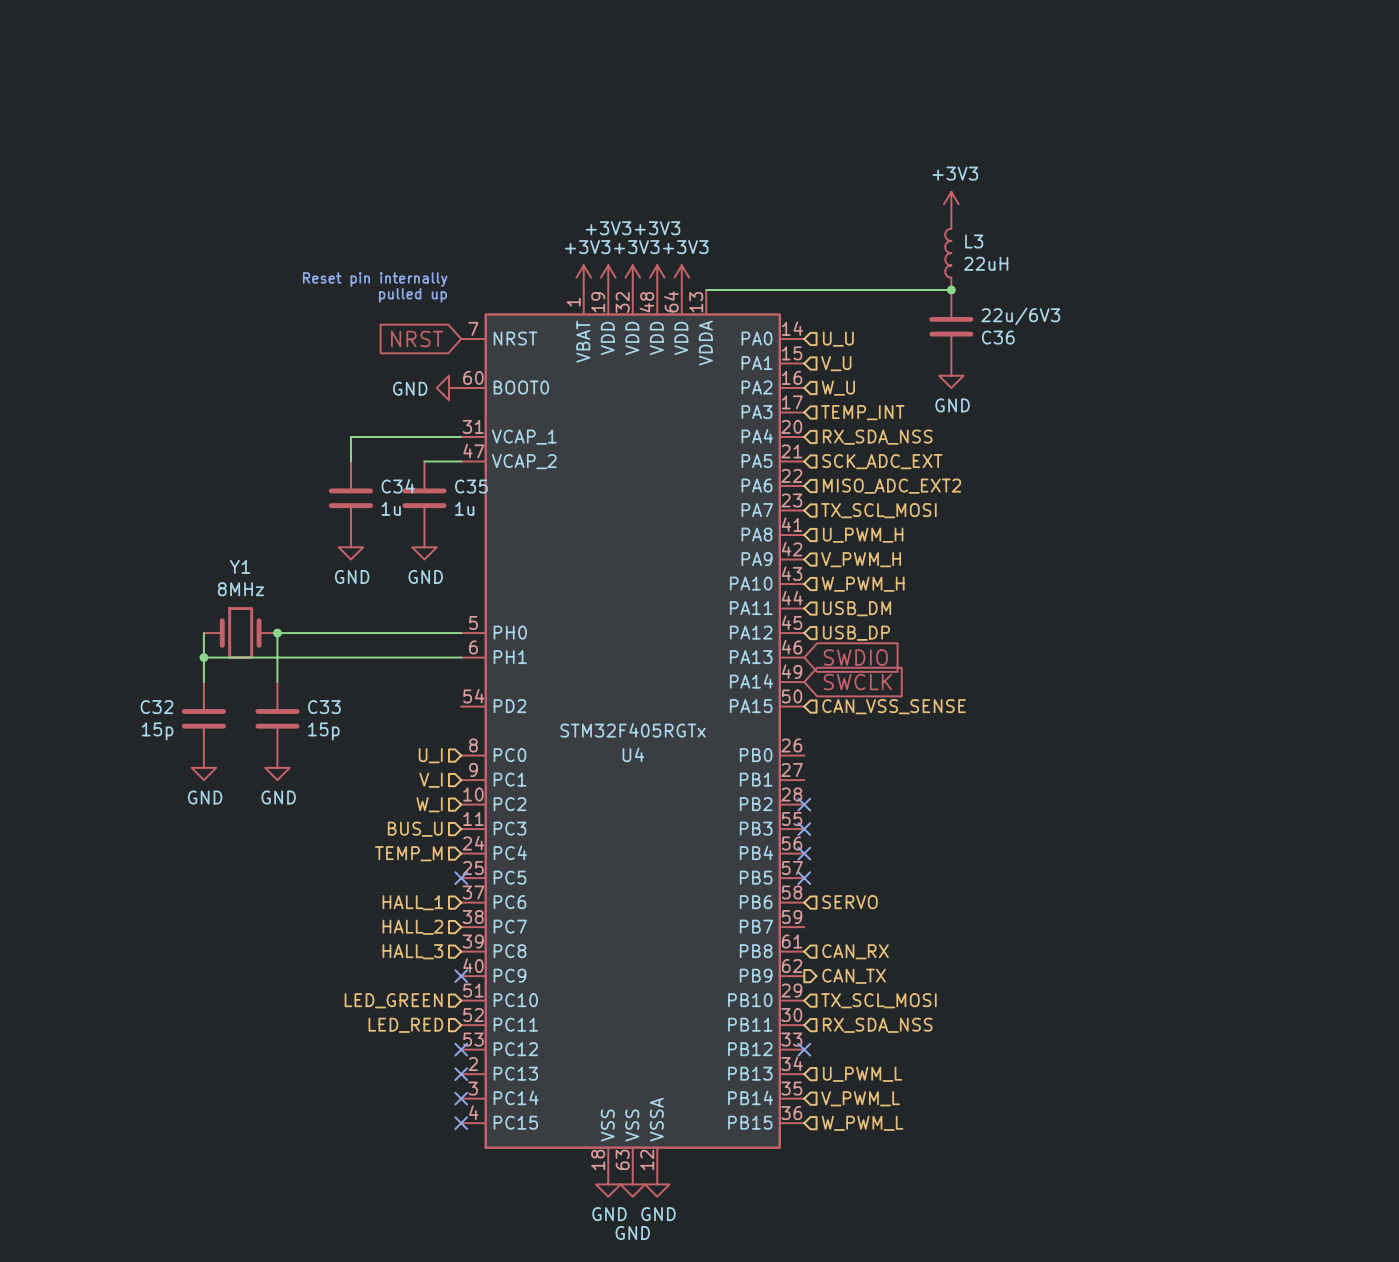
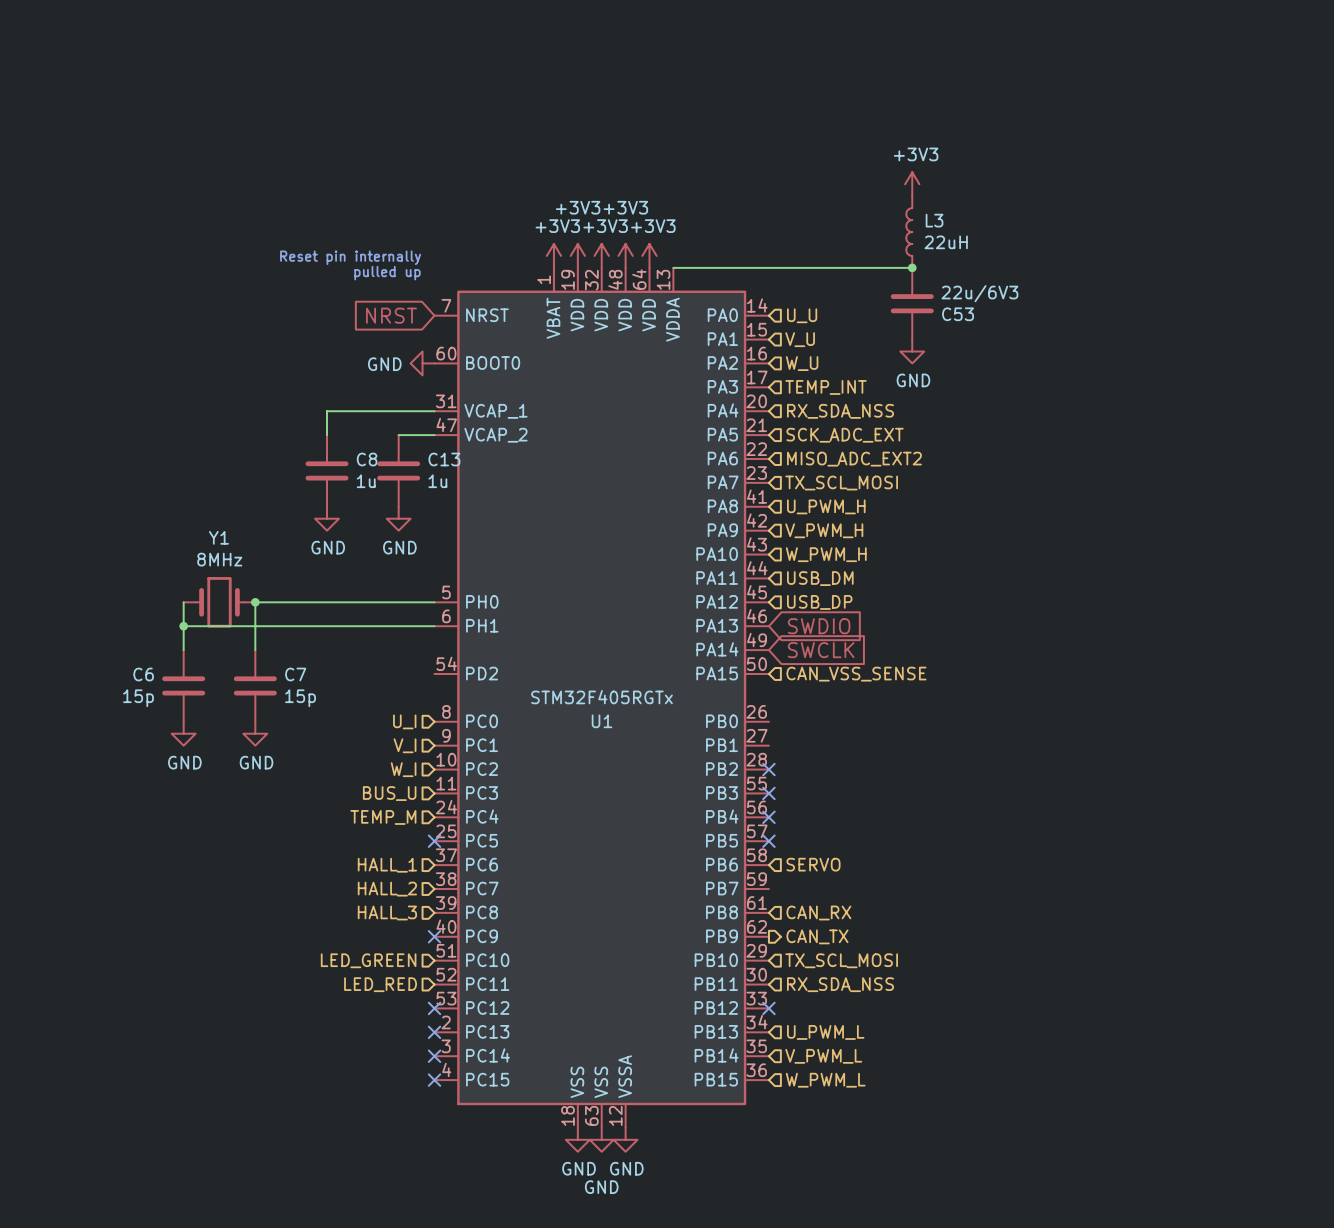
C36 name: C36 (998, 337) -> C53 (958, 314)
C34 name: C34 (398, 486) -> C8 (367, 459)
C35 name: C35 (471, 486) -> C13 (444, 459)
C32 name: C32 (156, 707) -> C6 (143, 674)
C33 name: C33 (324, 707) -> C7 (295, 674)
U4 name: U4 (633, 754) -> U1 (602, 721)

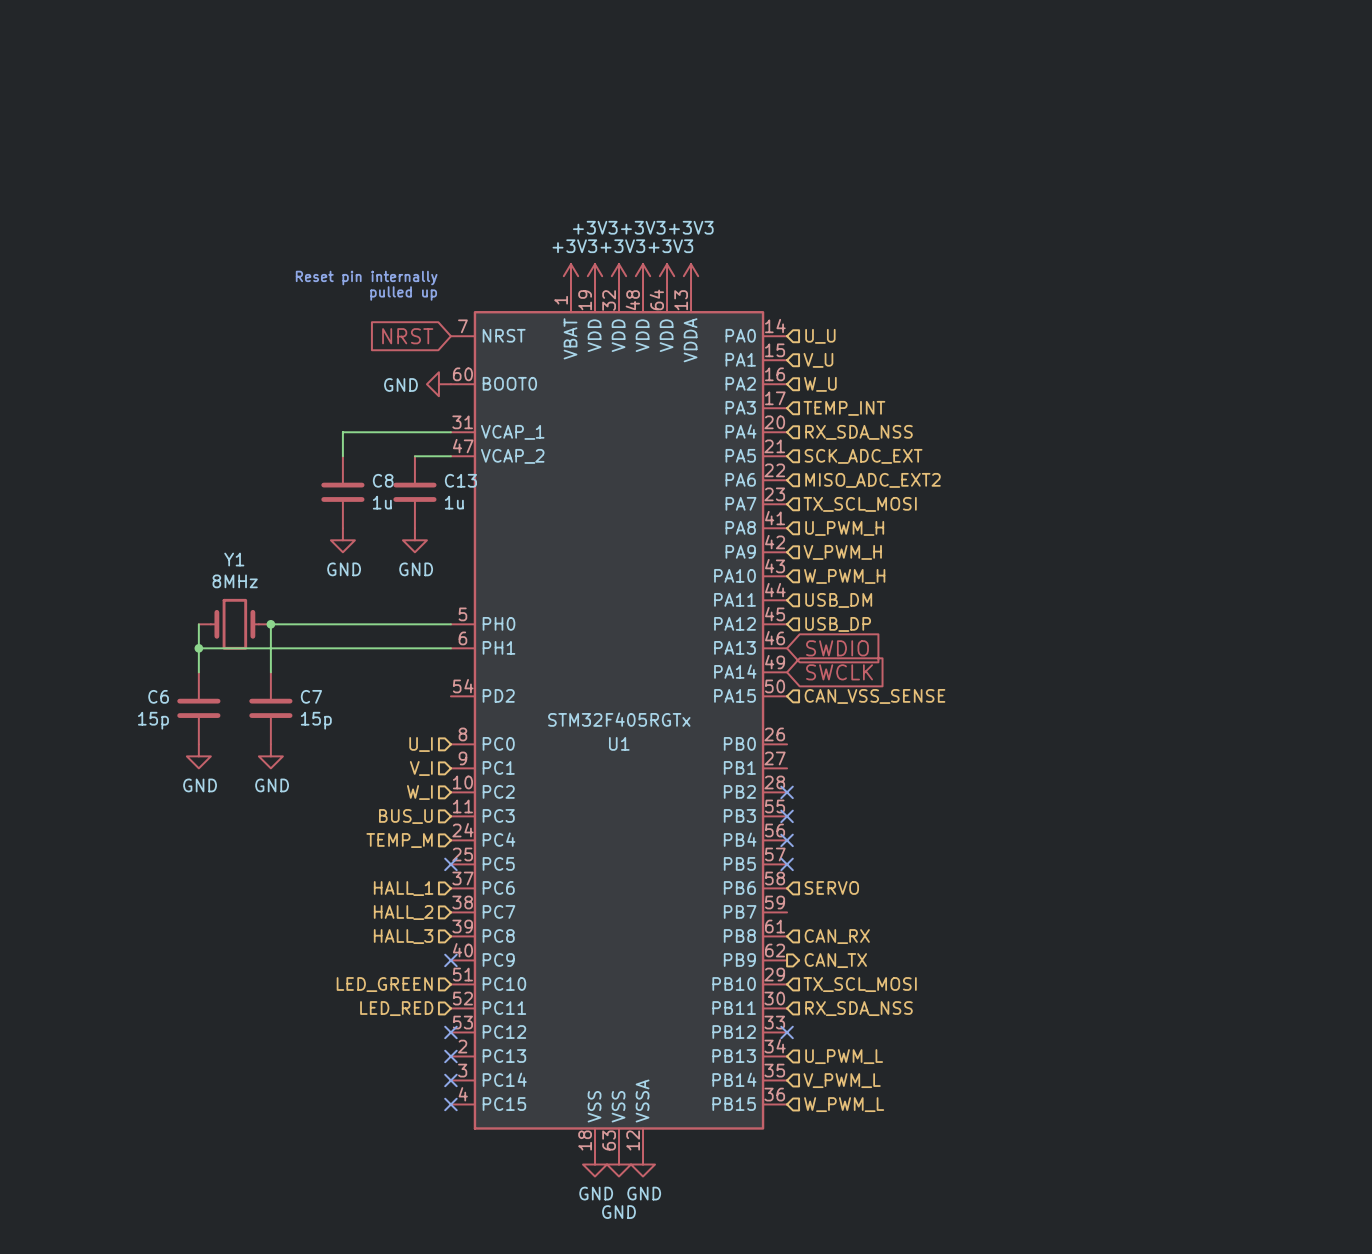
power symbol: +3V3 (912, 184) -> none
L3: 22uH (909, 232) -> none
power symbol: none -> +3V3 (691, 276)
wire: (673, 267) (912, 267) -> none
junction: (912, 267) -> none
C53: 22u/6V3 (912, 303) -> none
power symbol: GND (912, 351) -> none

